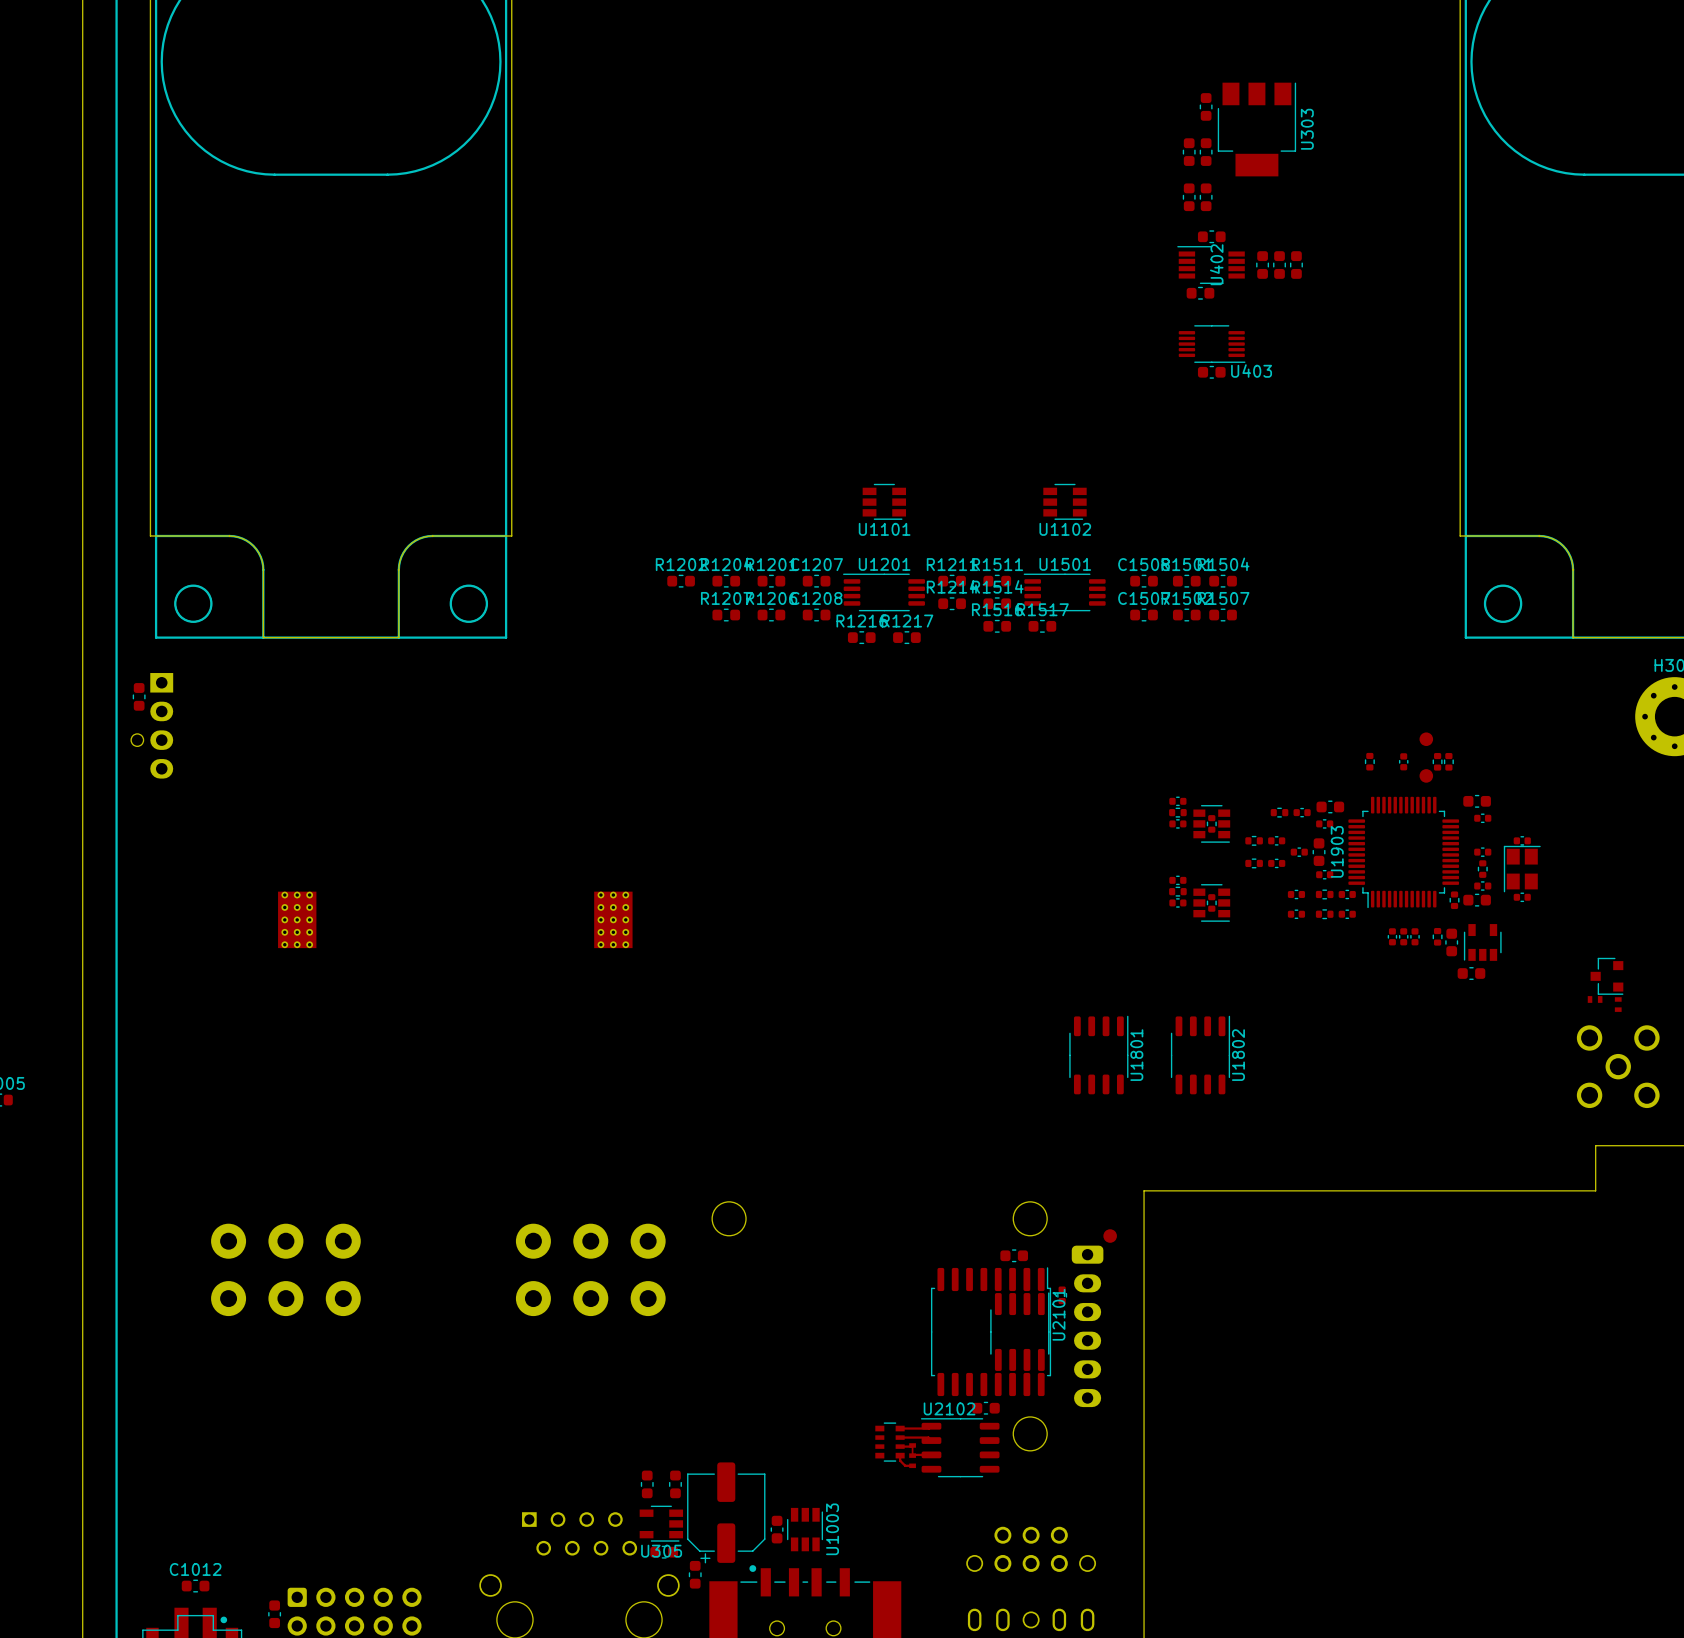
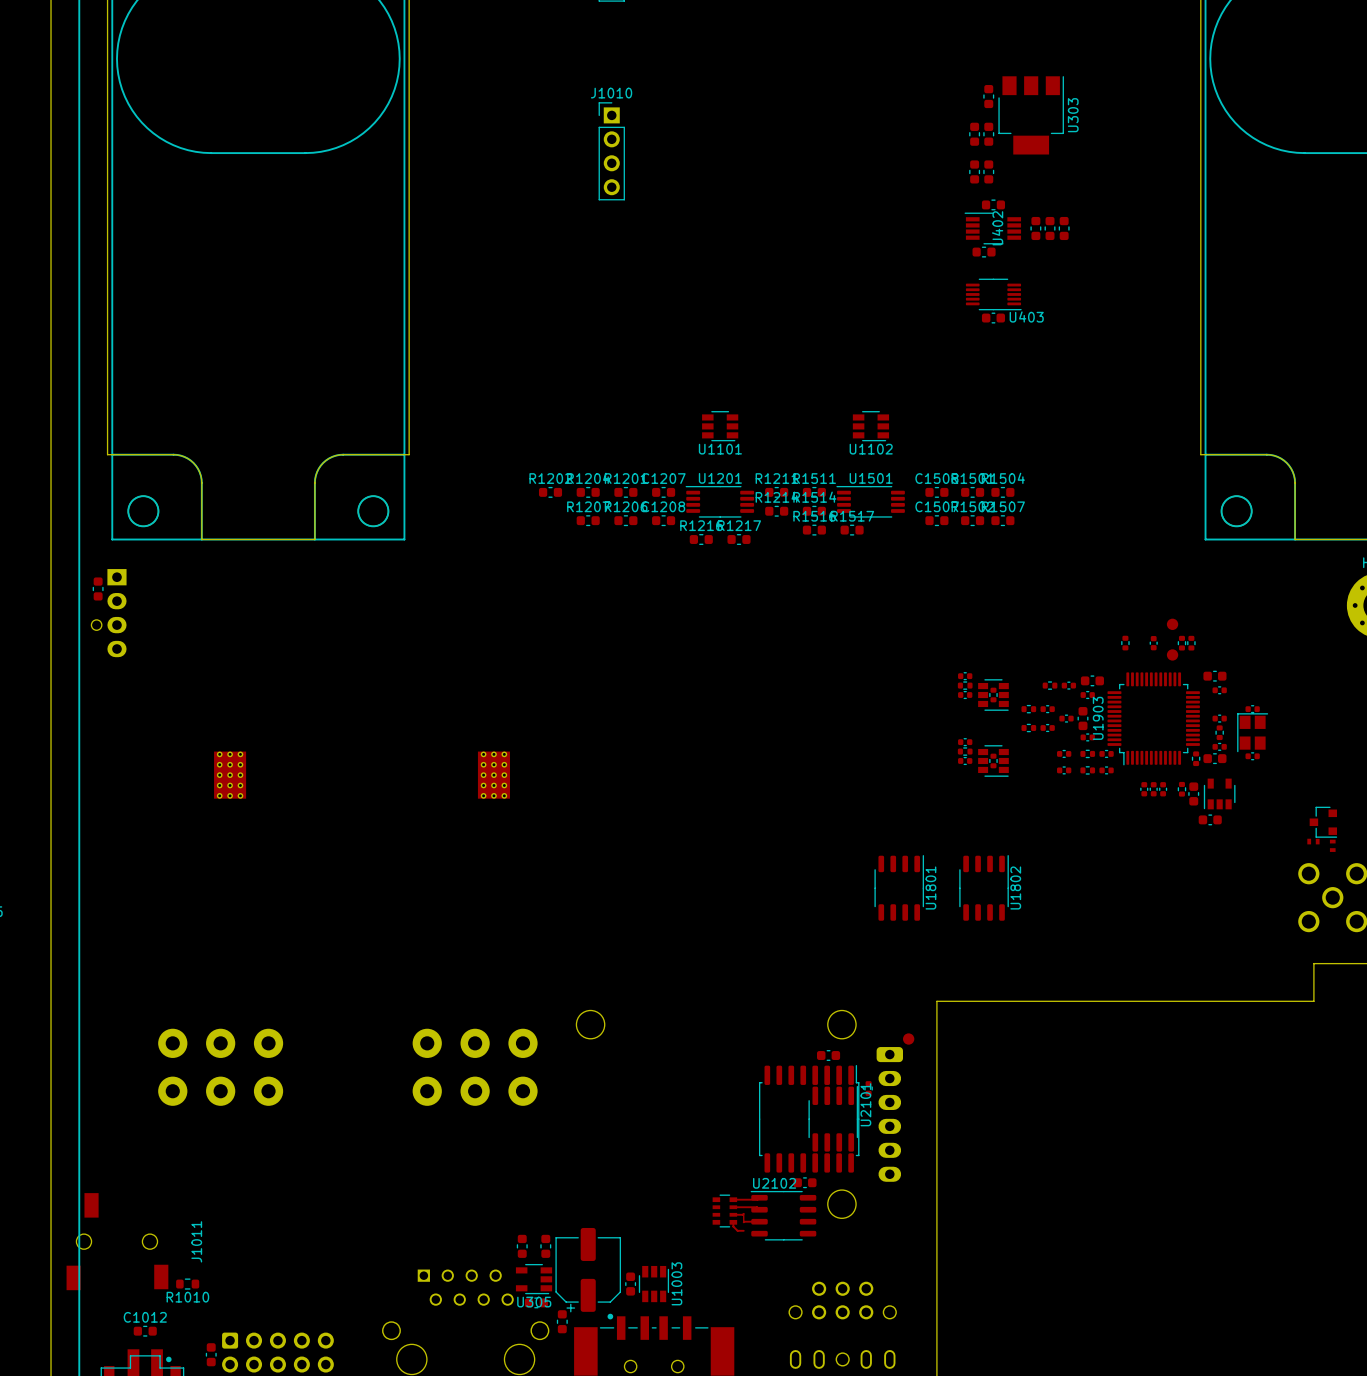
J1010: none -> (611, 151)
part: (912, 1455) -> none
J1011: none -> (117, 1241)
R1010: none -> (187, 1284)

